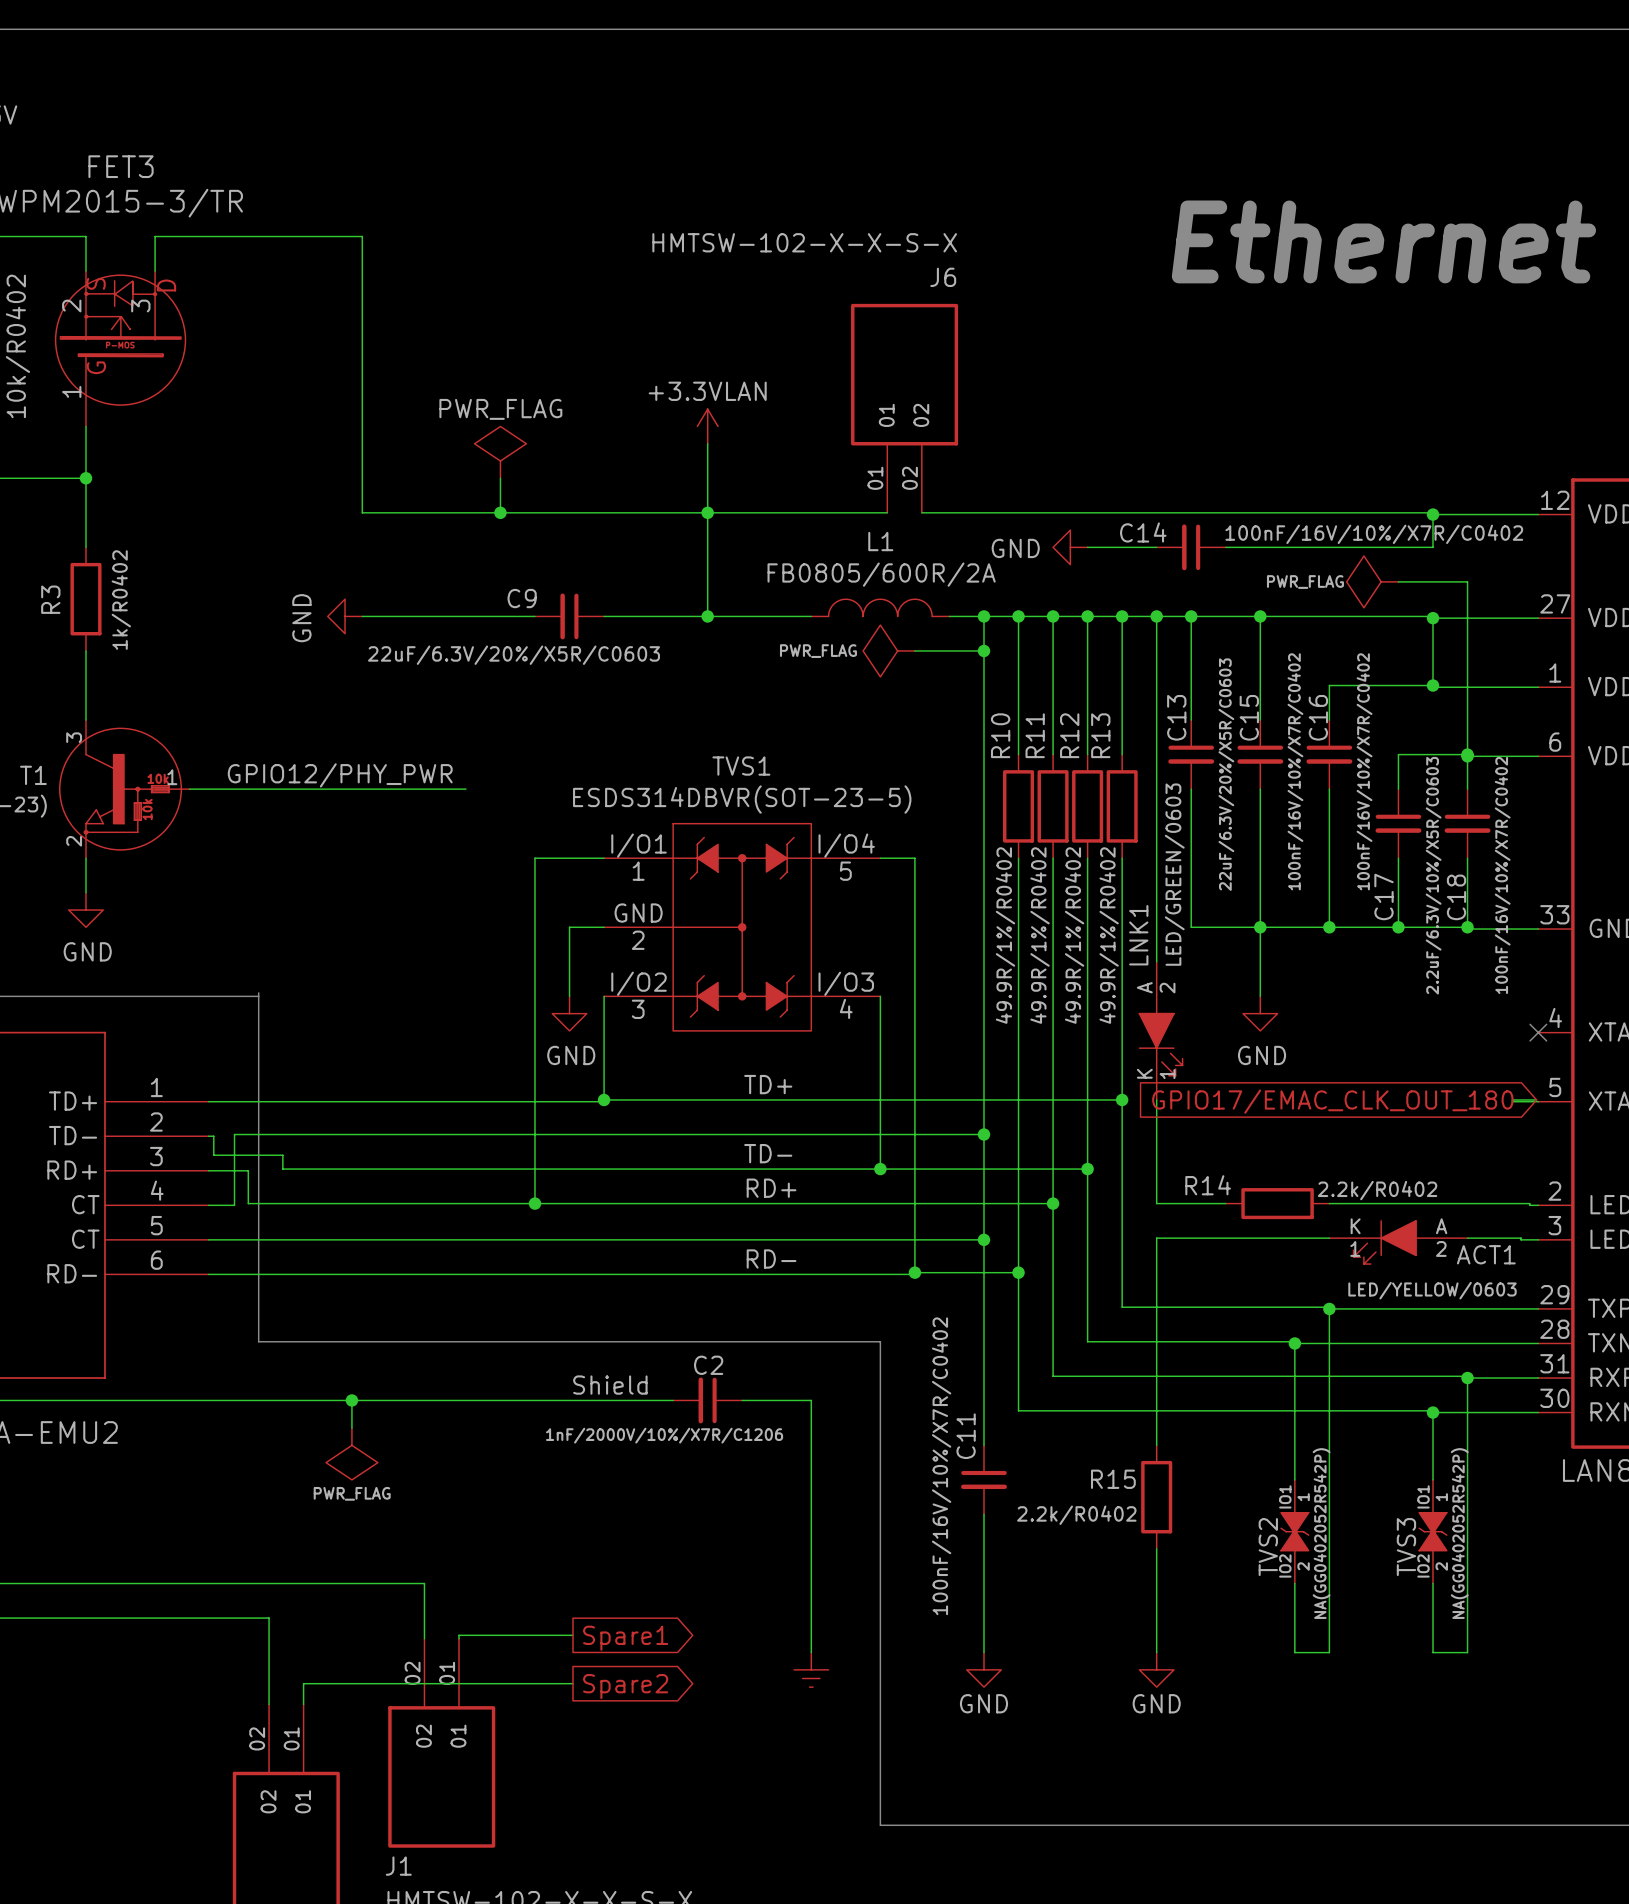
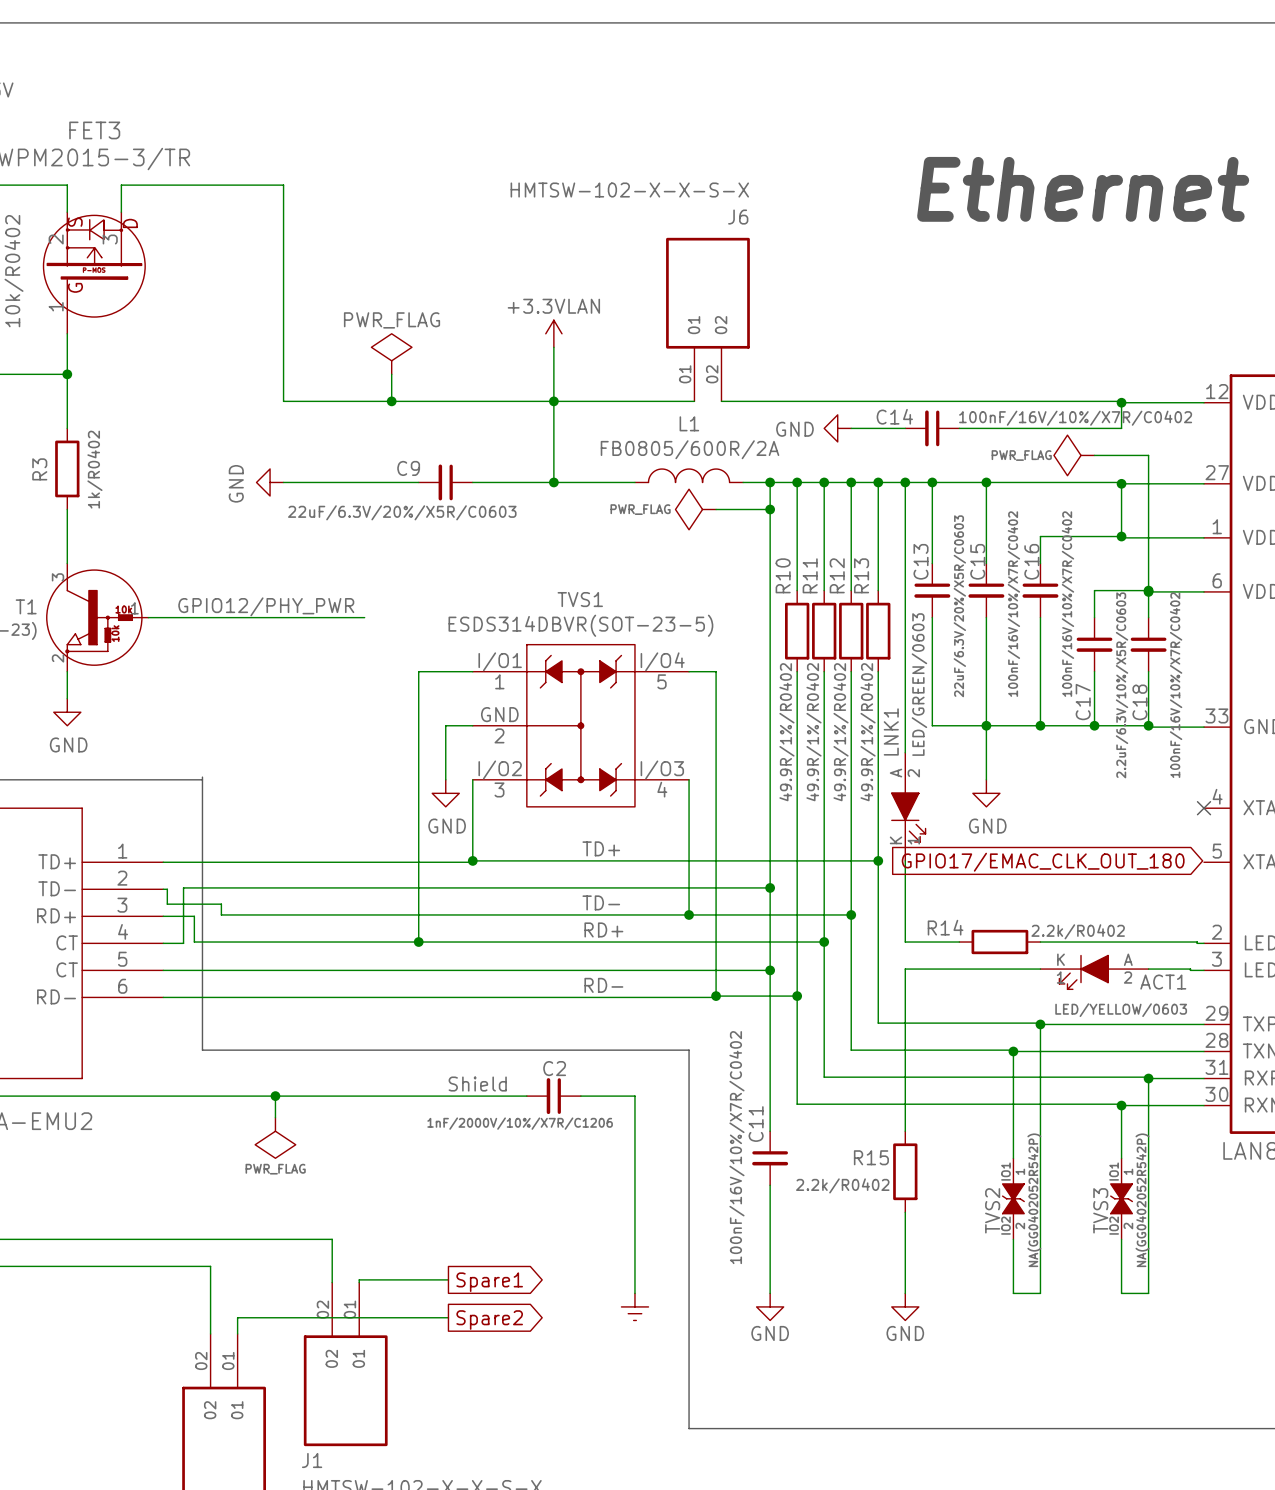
wire: (1536, 1099) (1512, 1099) (1512, 1101) (1538, 1101) -> none

